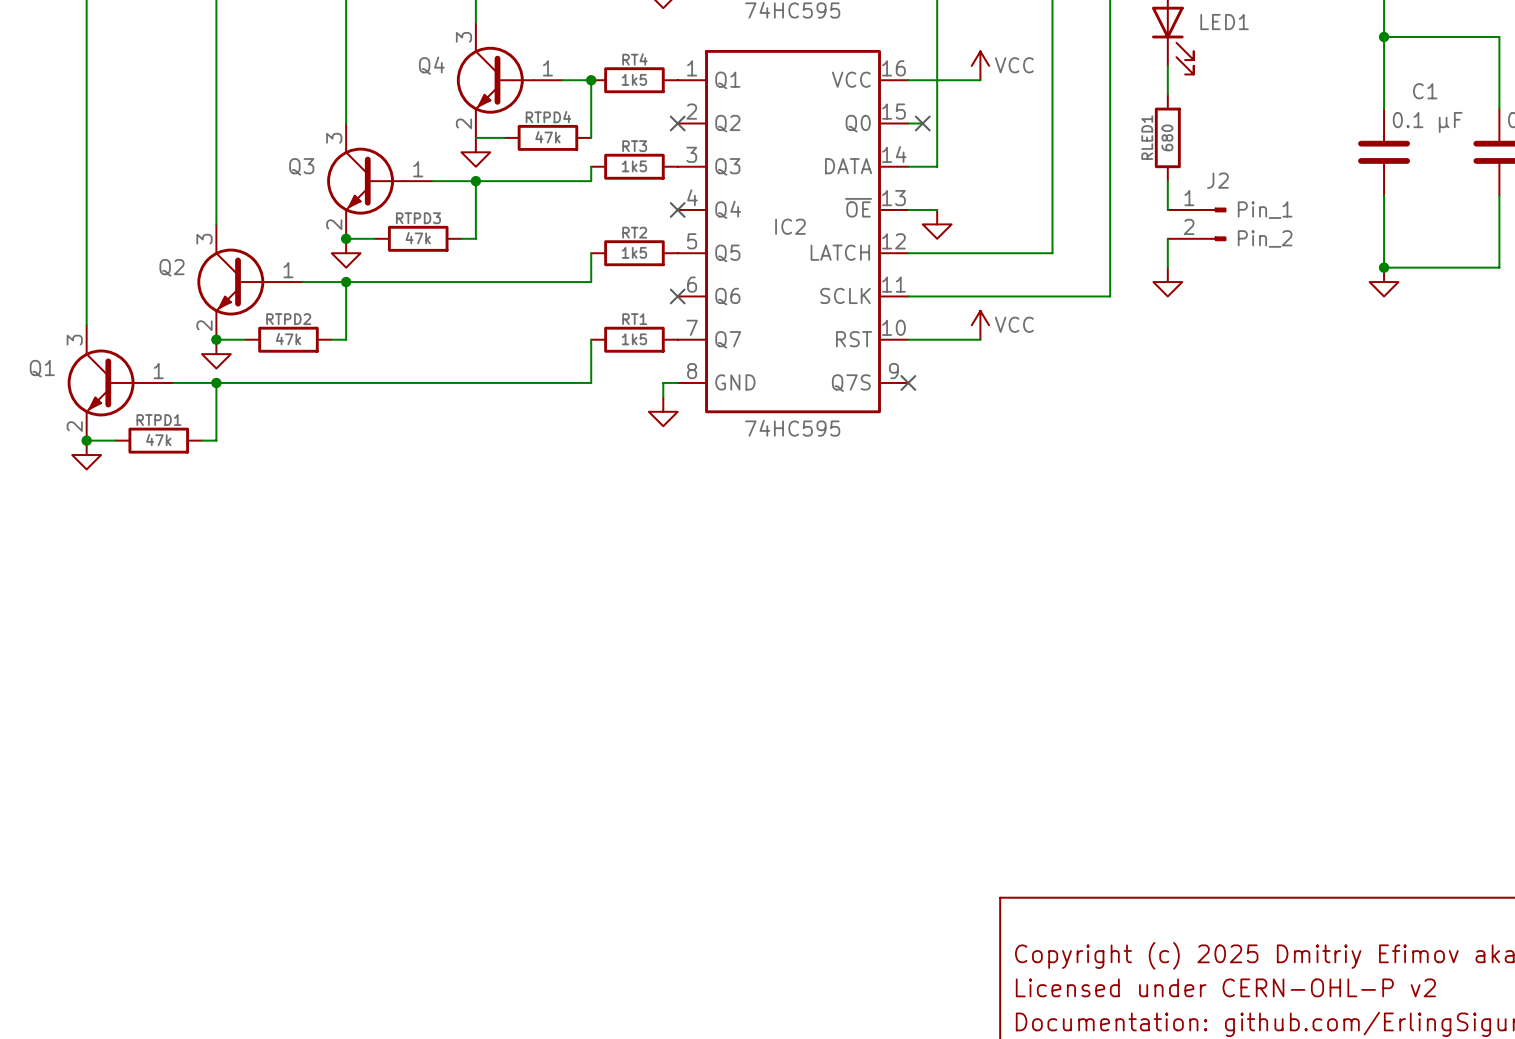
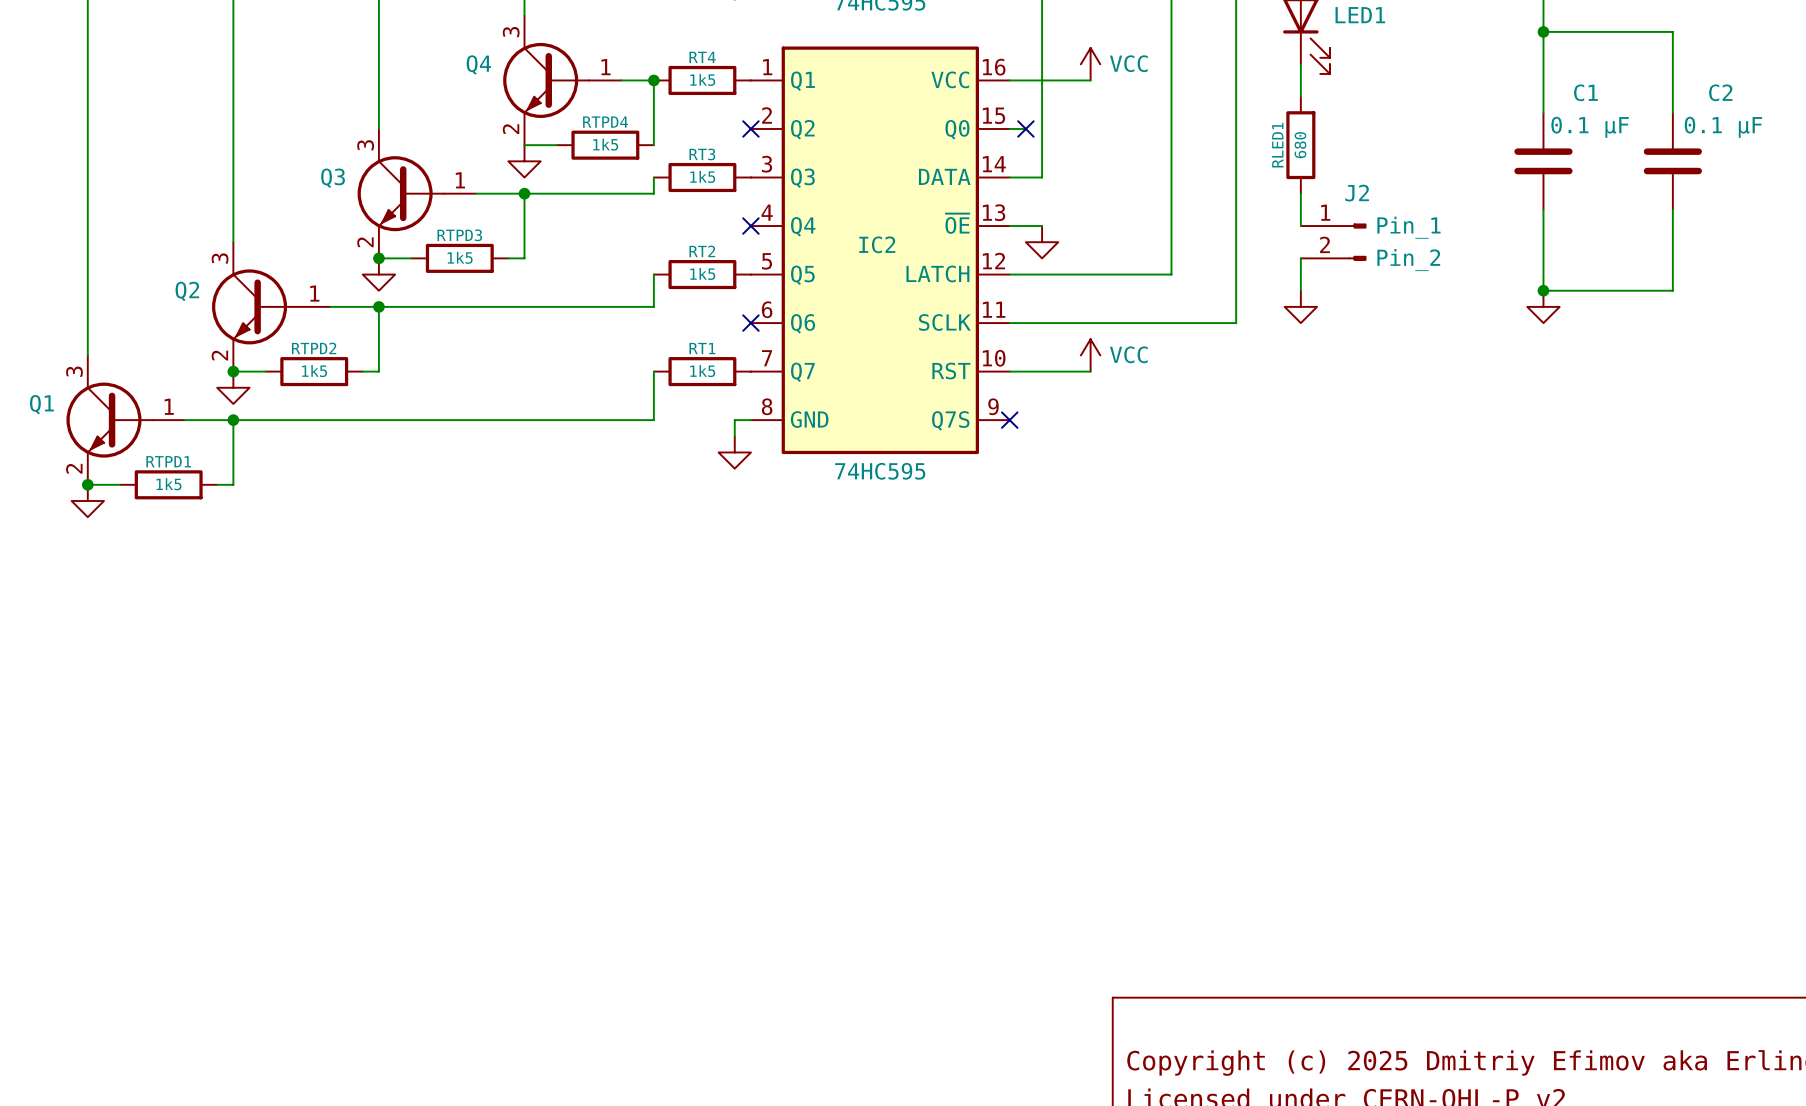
RTPD4 value: 47k (547, 137) -> 1k5 (605, 144)
RTPD3 value: 47k (418, 238) -> 1k5 (460, 257)
RTPD2 value: 47k (288, 339) -> 1k5 (314, 371)
RTPD1 value: 47k (158, 440) -> 1k5 (168, 484)

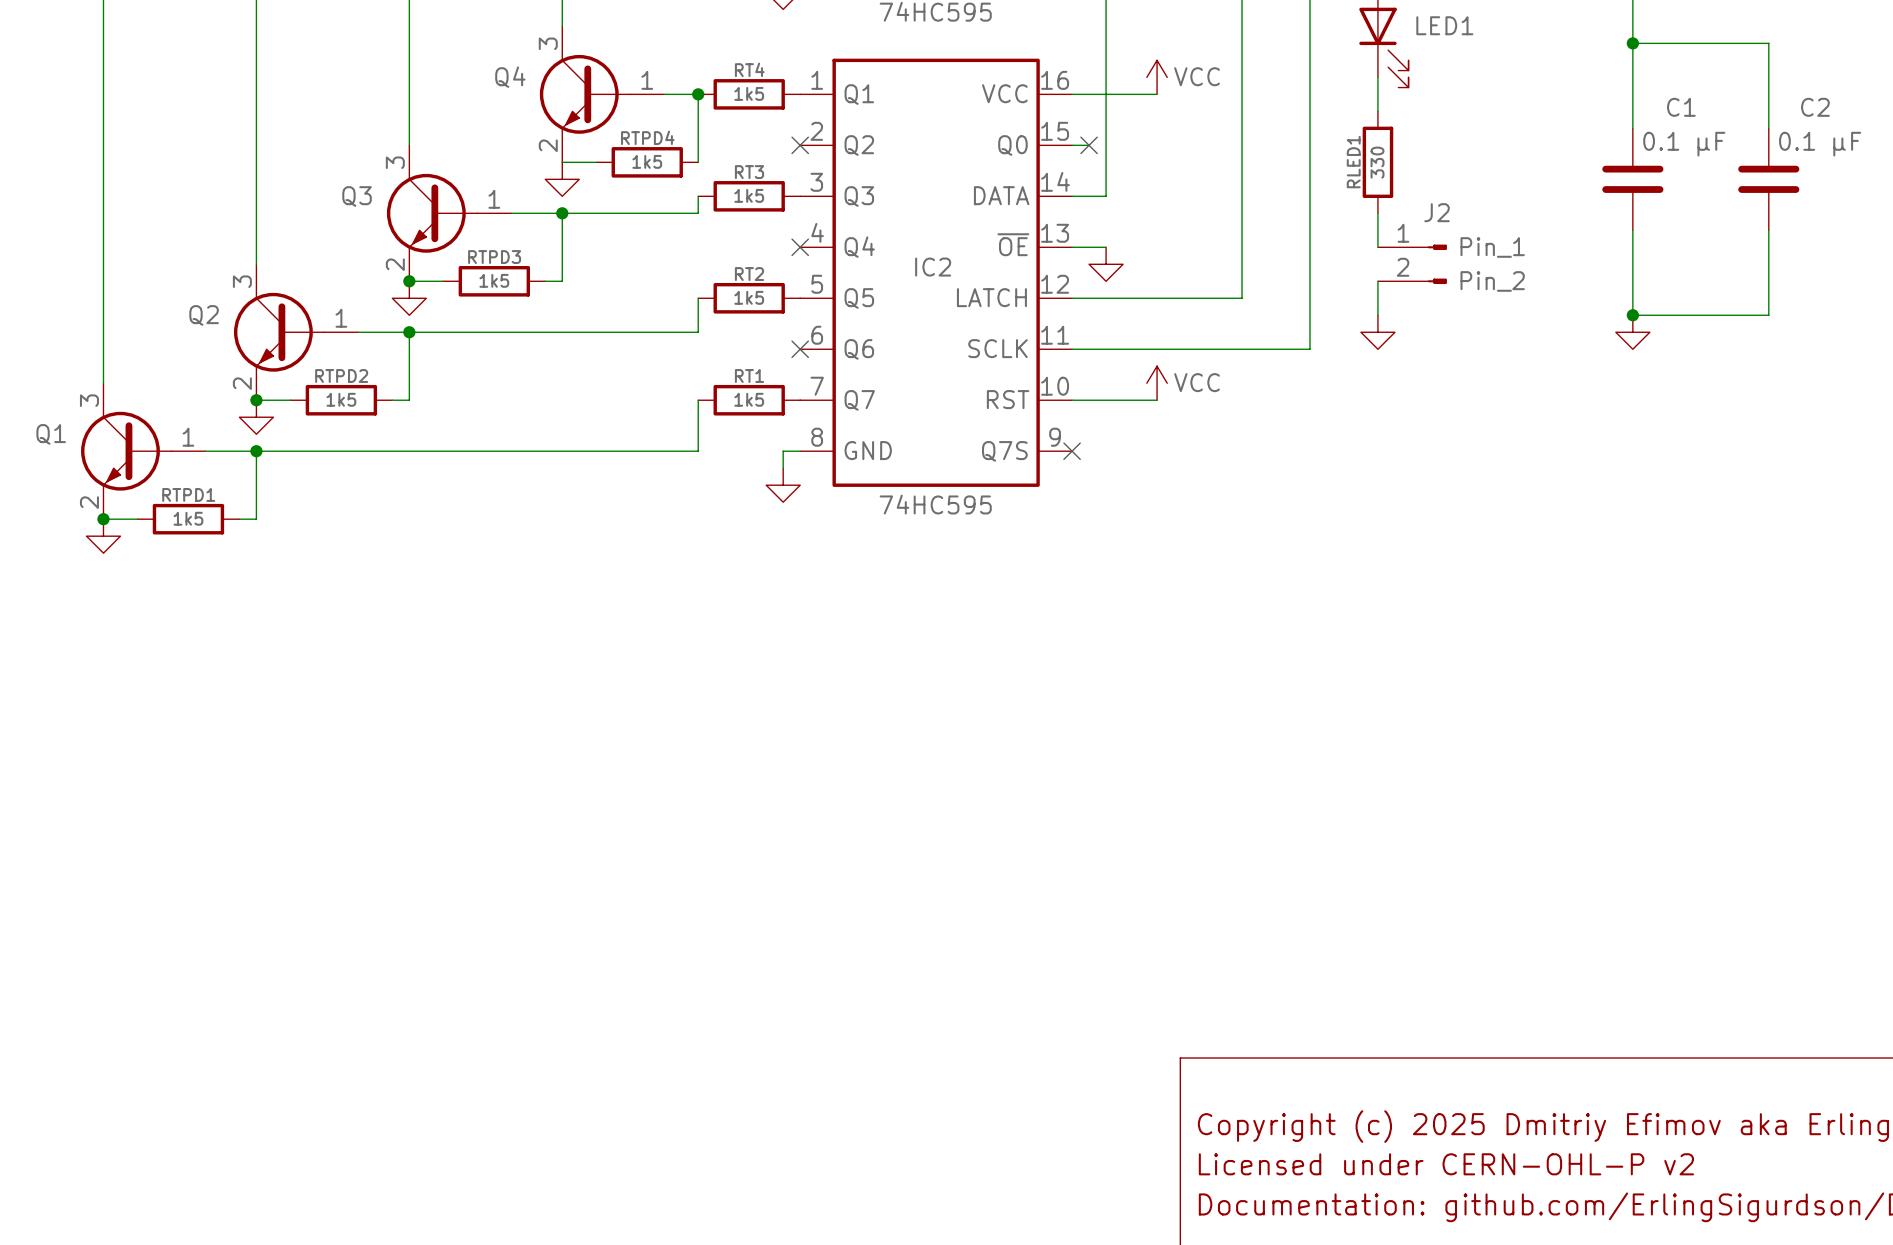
RLED1 value: 680 (1300, 145) -> 330 (1377, 162)

